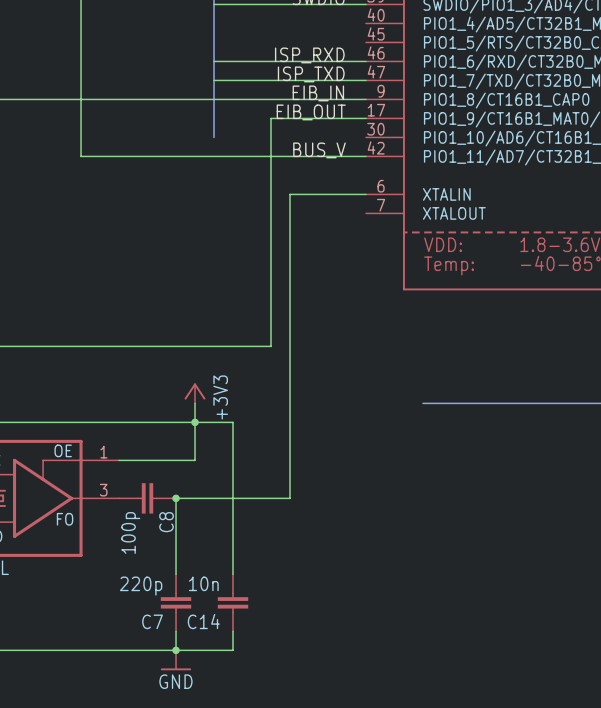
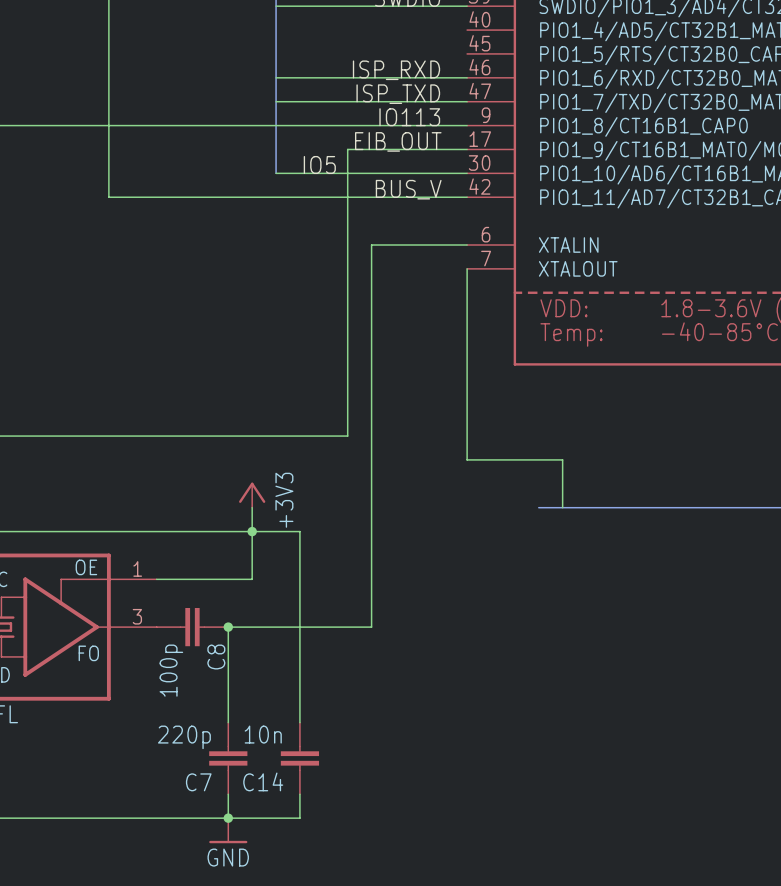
label: EIB_IN (318, 93) -> IO113 (409, 117)
label: none -> IO5 (319, 164)
wire: none -> (276, 173) (467, 173)
wire: none -> (467, 268) (467, 459) (562, 459) (562, 507)

